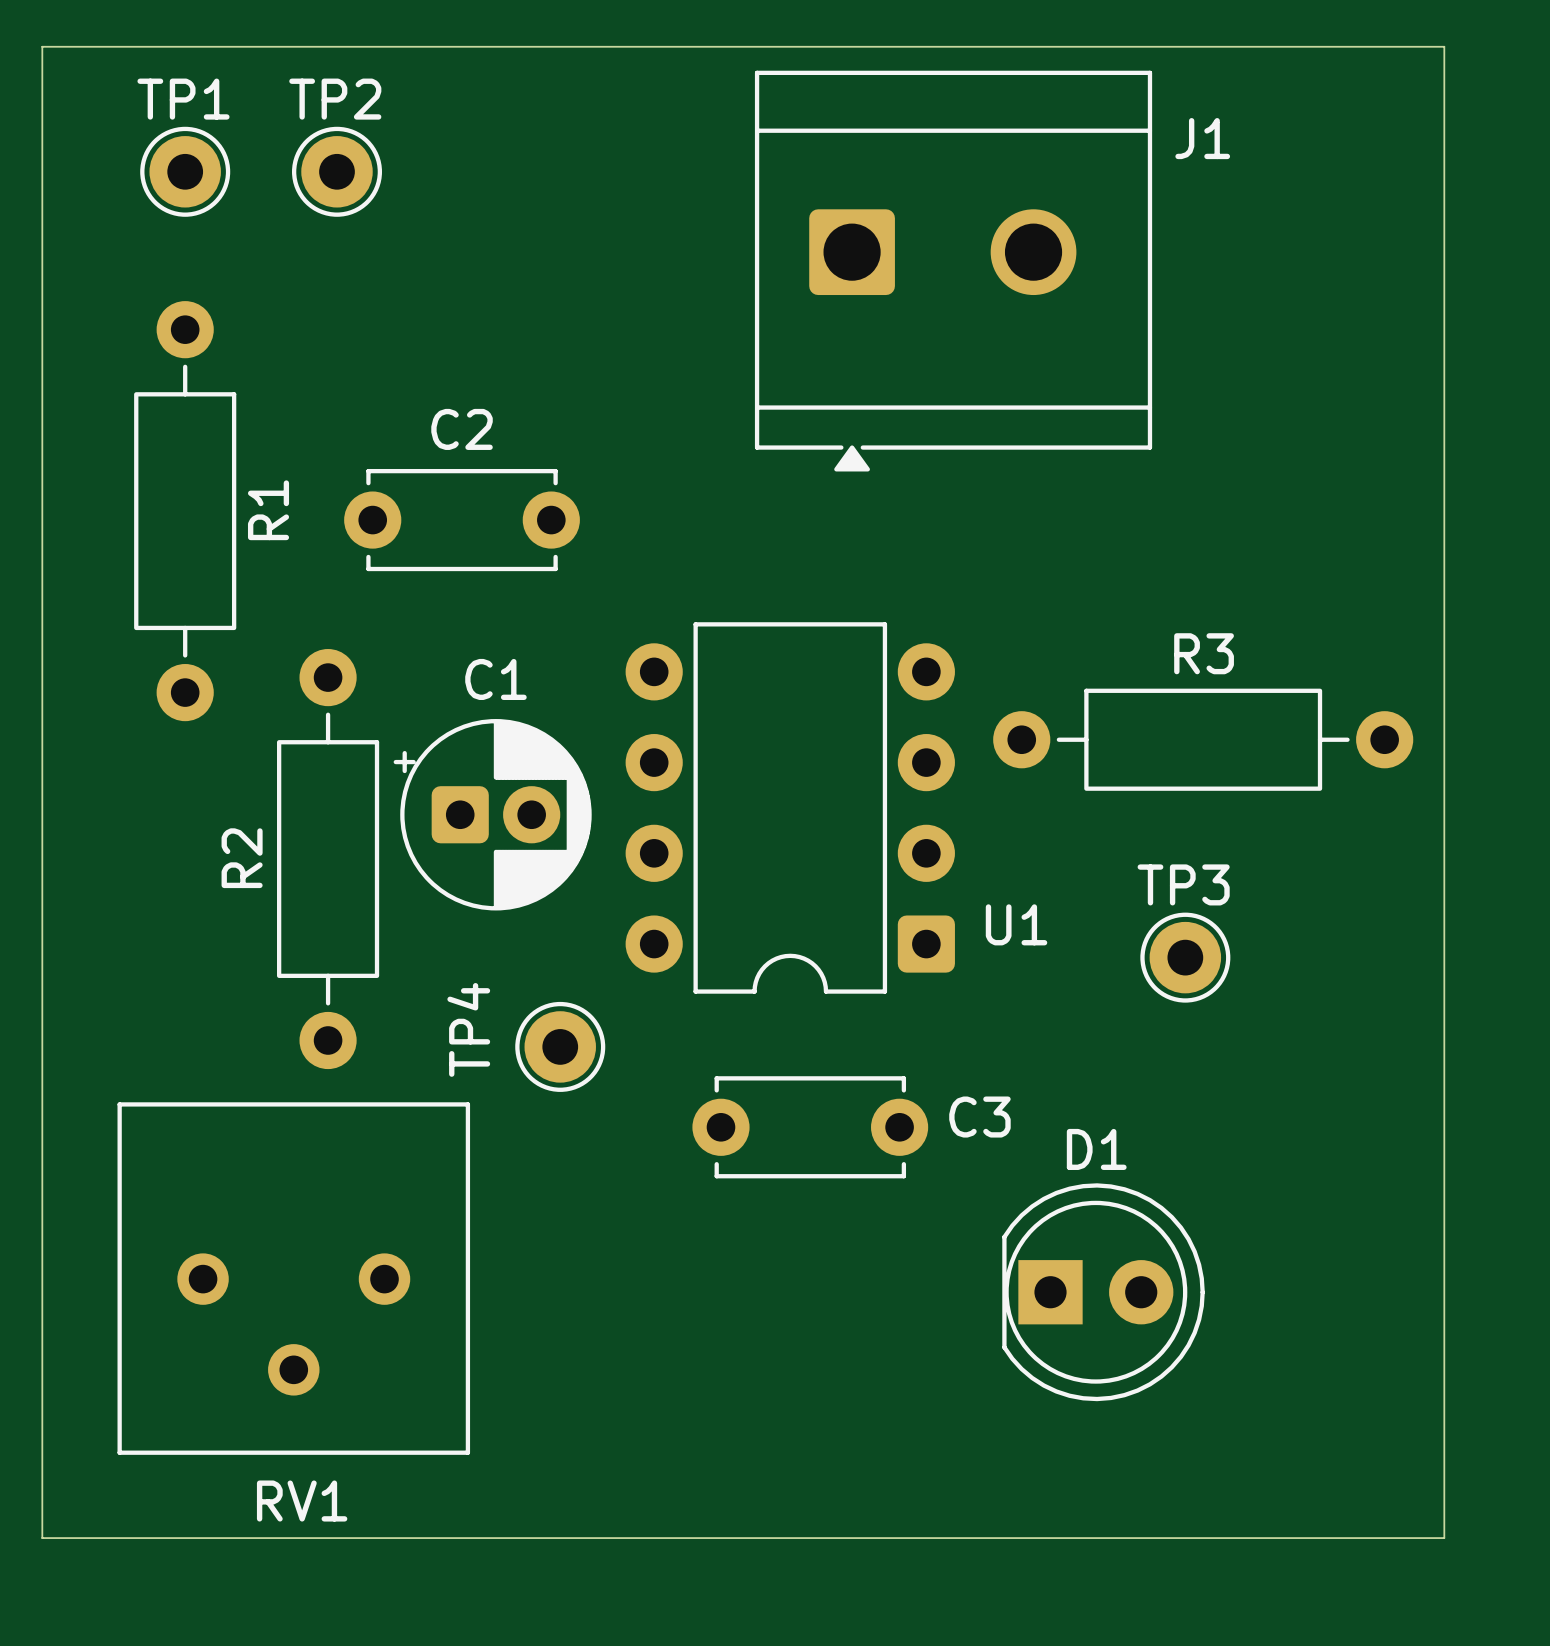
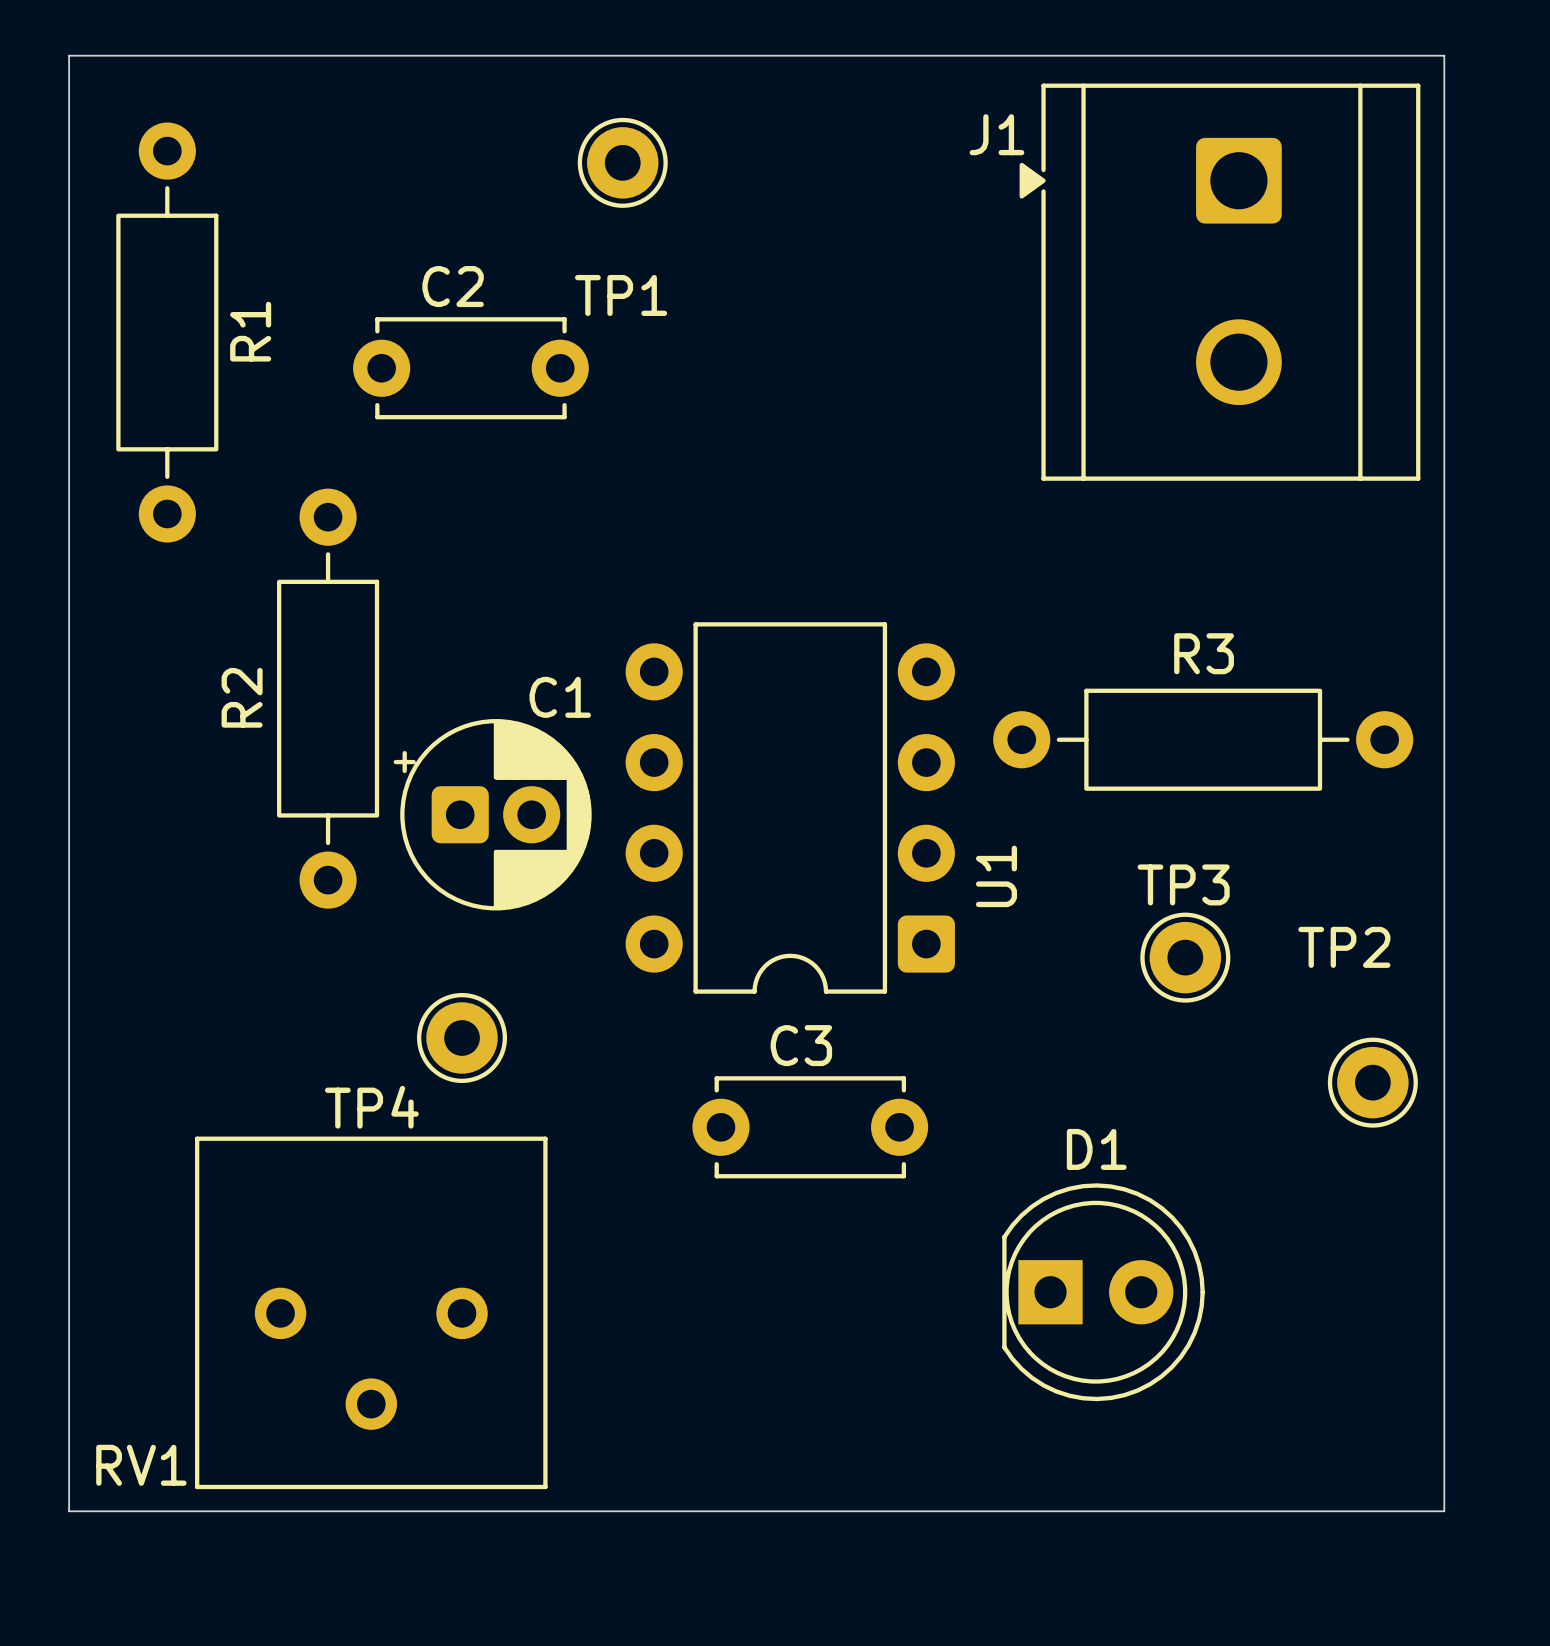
board edge: (1444, 55) (1444, 46) (42, 46) (42, 1538) (1444, 1538) (1444, 1511) -> (1444, 55) (69, 55) (69, 1511) (1444, 1511)
TP1 name position: TP1 (183, 99) -> TP1 (621, 295)
TP2 name position: TP2 (335, 99) -> TP2 (1344, 947)
J1 name position: J1 (1202, 138) -> J1 (996, 134)
TP1 position: (185, 171) -> (622, 162)
TP2 position: (337, 171) -> (1372, 1082)
J1 rotation: 0° (953, 271) -> 90° clockwise (1219, 282)
J1 position: (953, 271) -> (1219, 282)
C2 name position: C2 (462, 429) -> C2 (453, 286)
R1 position: (185, 511) -> (167, 332)
C2 position: (462, 520) -> (470, 368)
C1 name position: C1 (495, 679) -> C1 (560, 697)
R2 position: (328, 859) -> (328, 698)
U1 name rotation: 0° (1016, 924) -> 90° counterclockwise (996, 876)
TP4 name rotation: 0° (468, 1029) -> 90° clockwise (371, 1107)
TP4 position: (560, 1046) -> (462, 1037)
C3 name position: C3 (979, 1117) -> C3 (801, 1045)
RV1 position: (293, 1278) -> (371, 1312)
RV1 name position: RV1 (302, 1501) -> RV1 (141, 1465)

